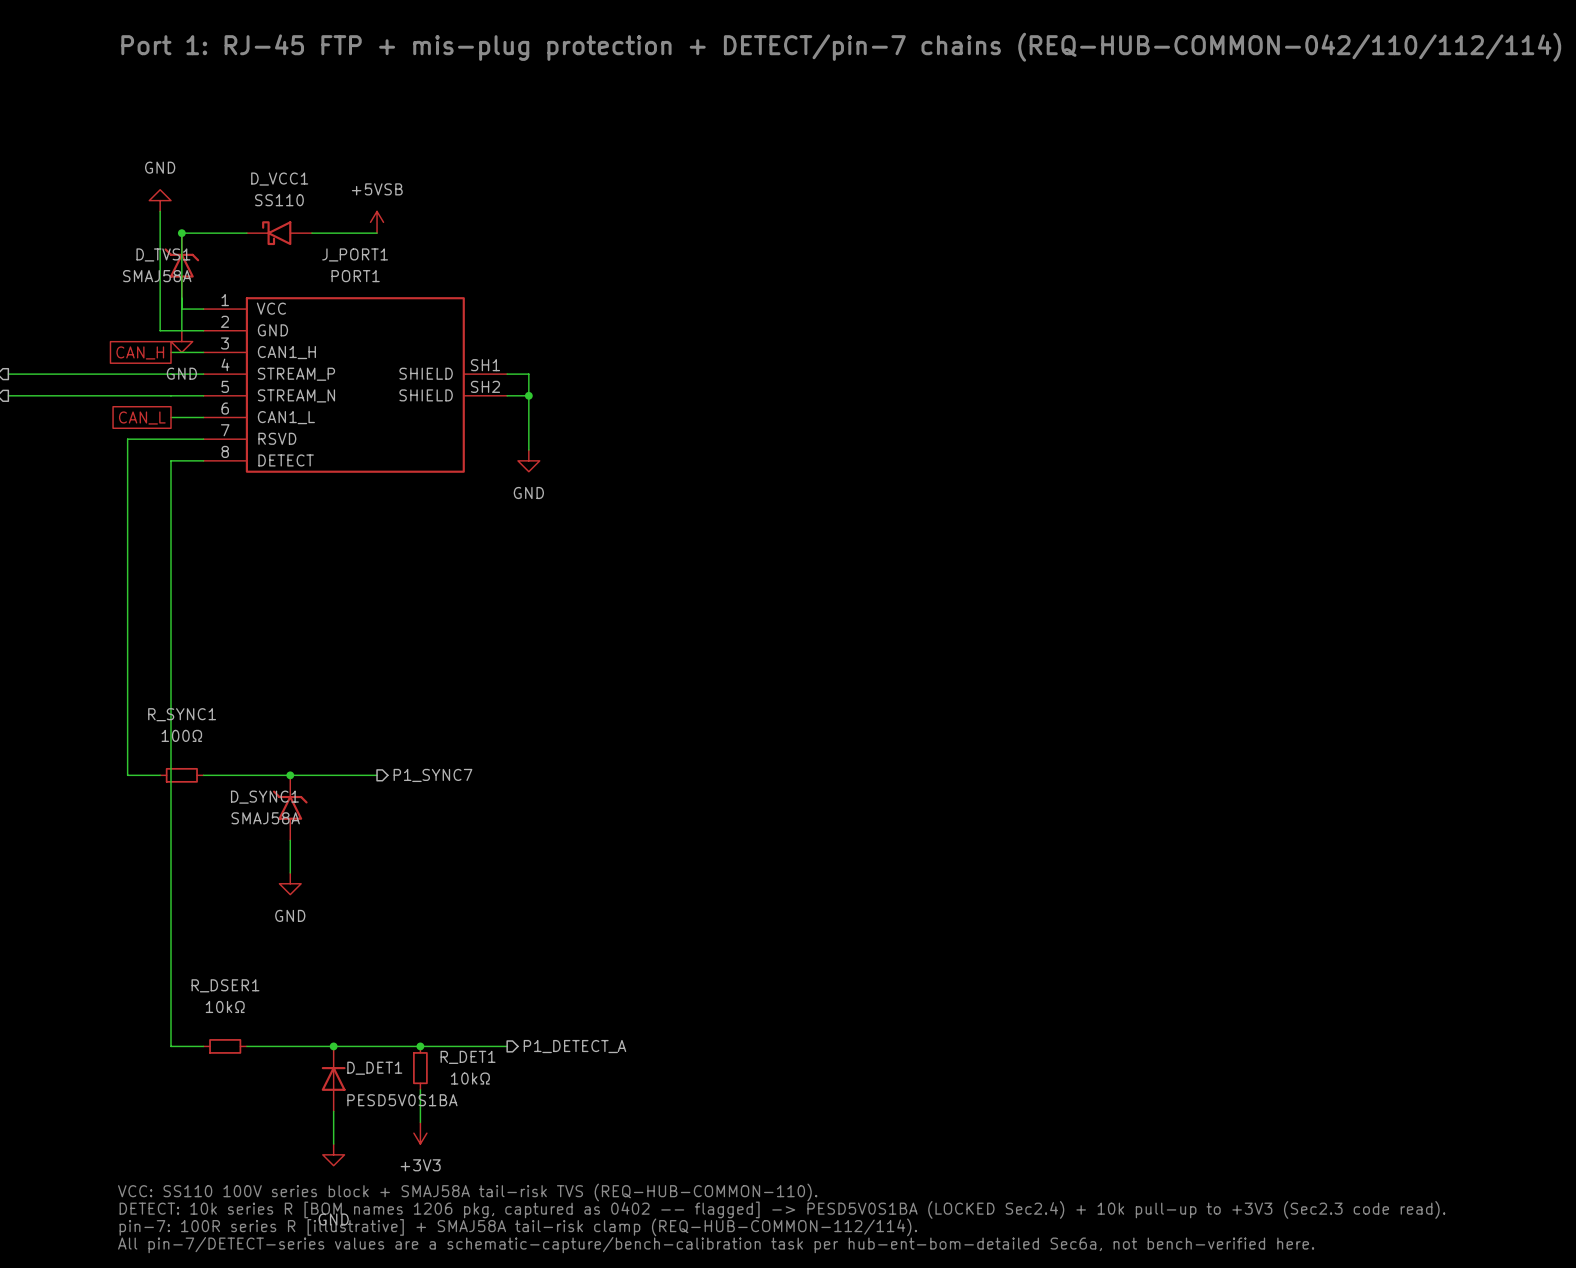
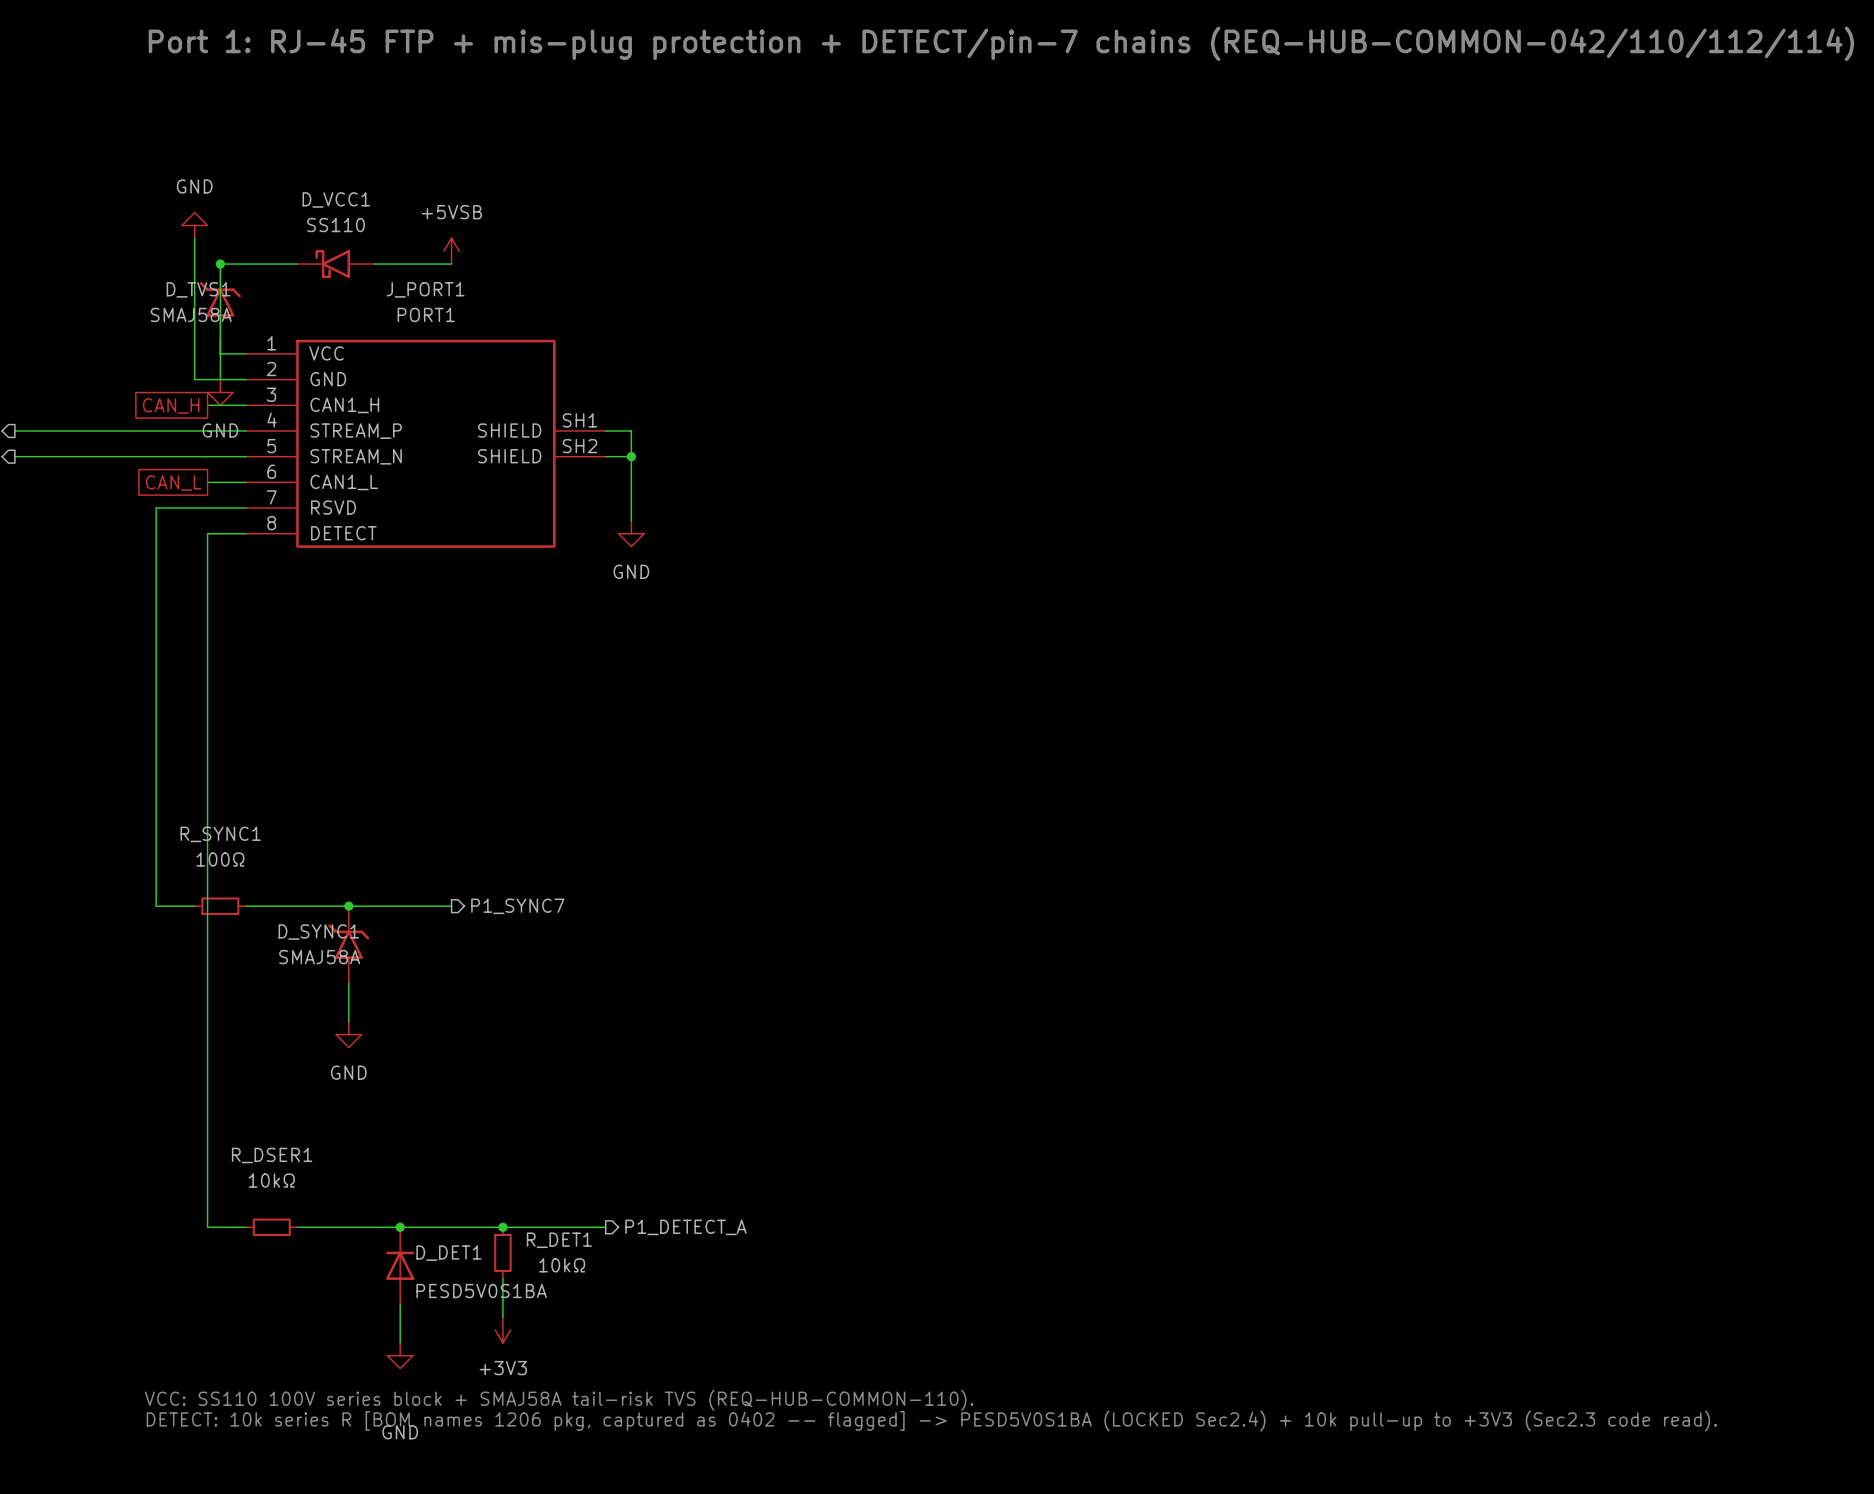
text: pin-7: 100R series R [illustrative] + SMAJ58A tail-risk clamp (REQ-HUB-COMMON-112/114). (518, 1227) -> none
text: All pin-7/DETECT-series values are a schematic-capture/bench-calibration task per hub-ent-bom-detailed Sec6a, not bench-verified here. (716, 1245) -> none

